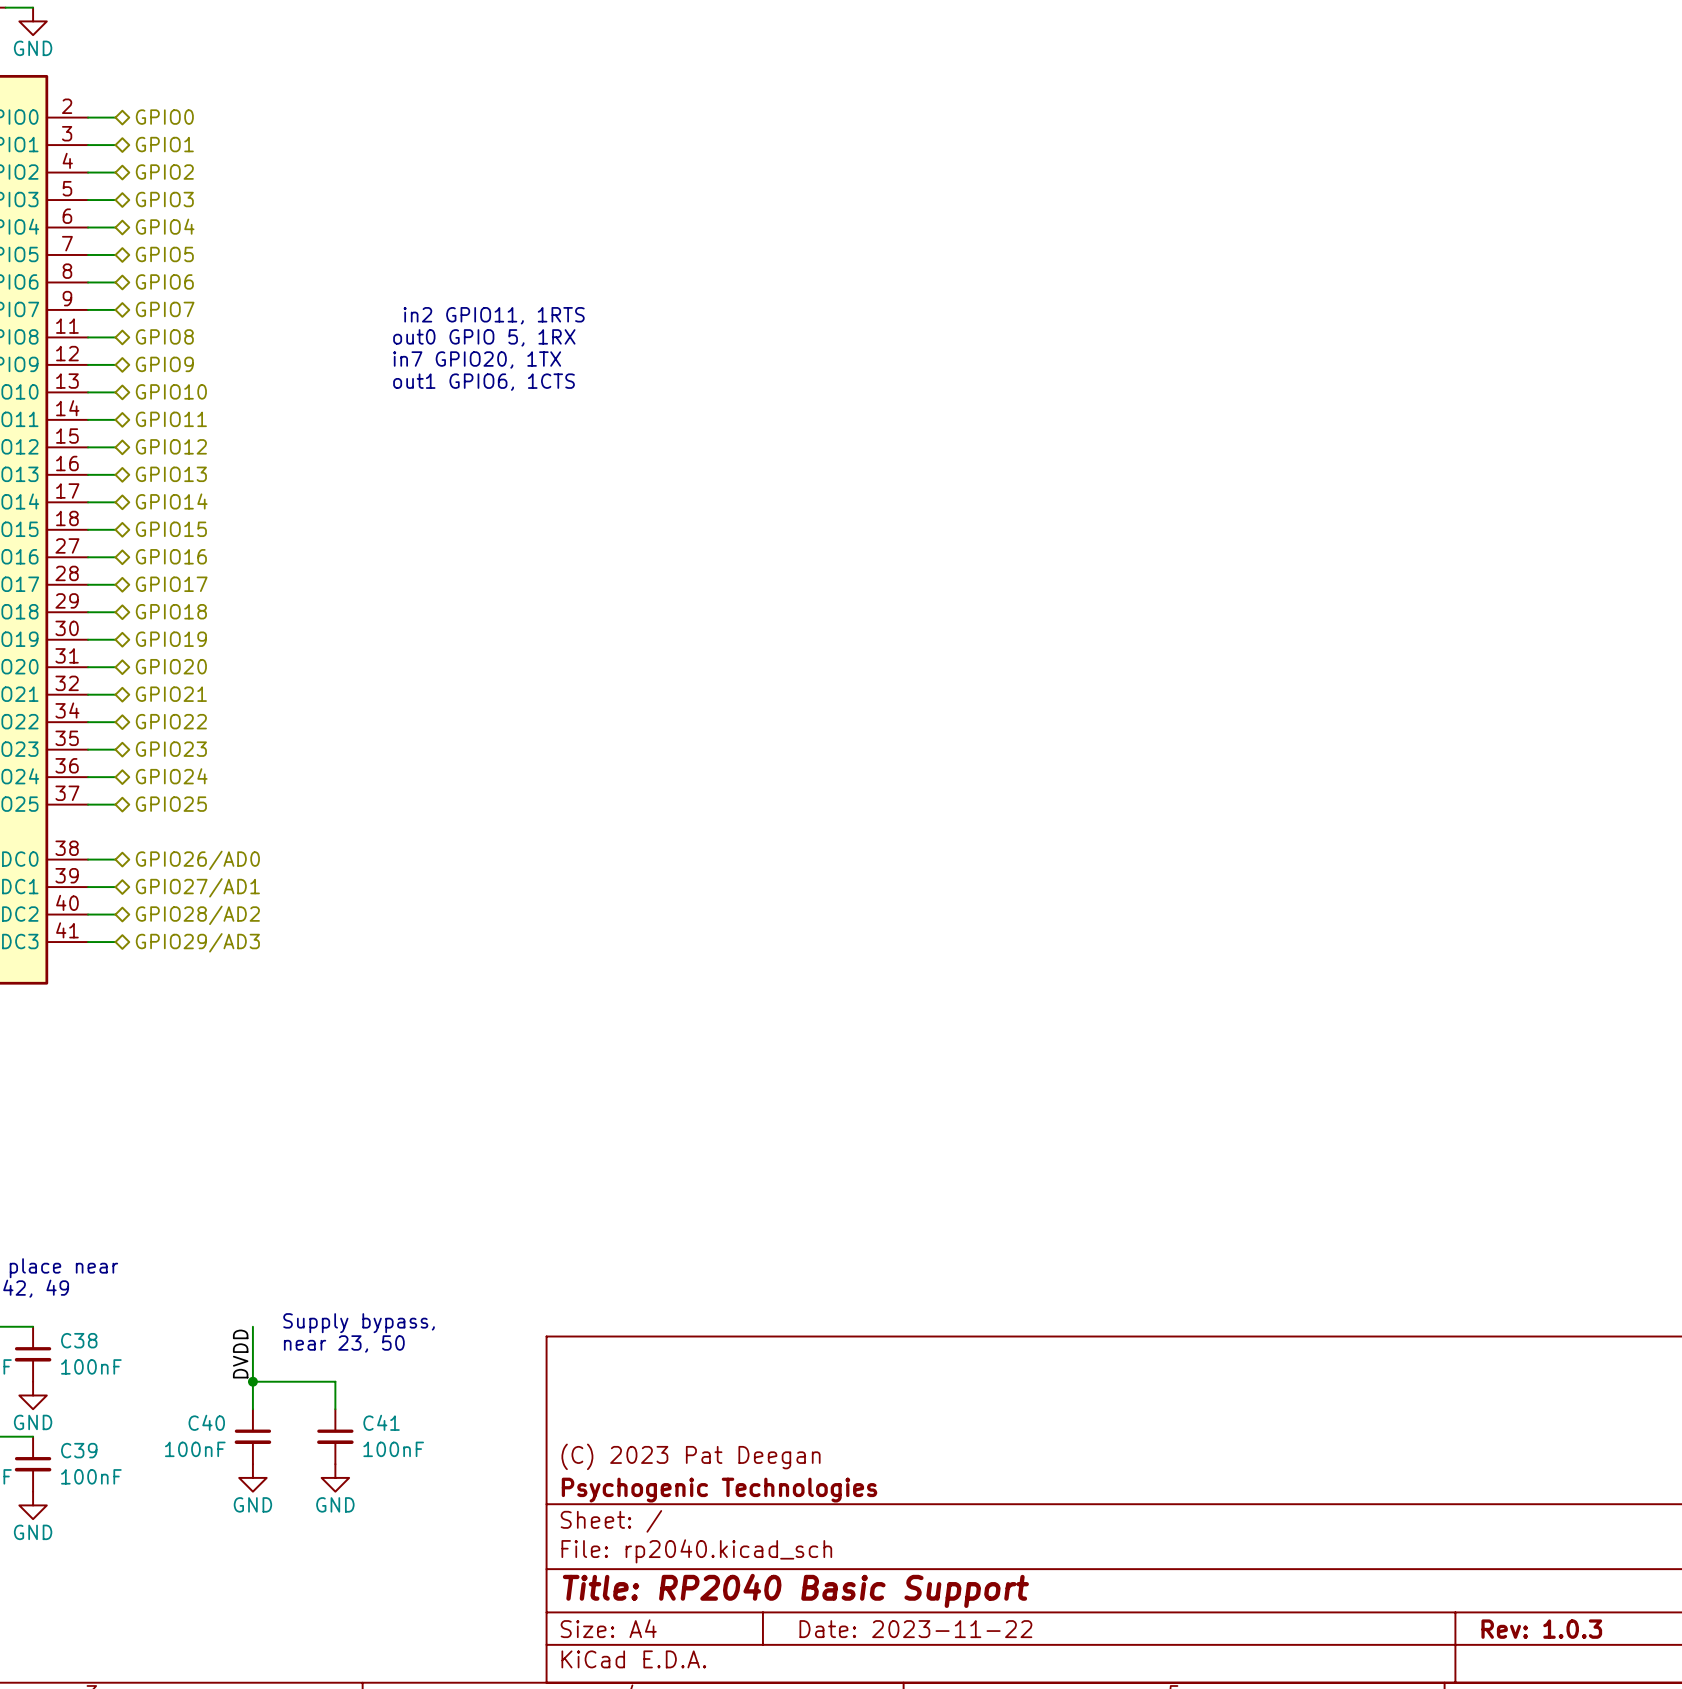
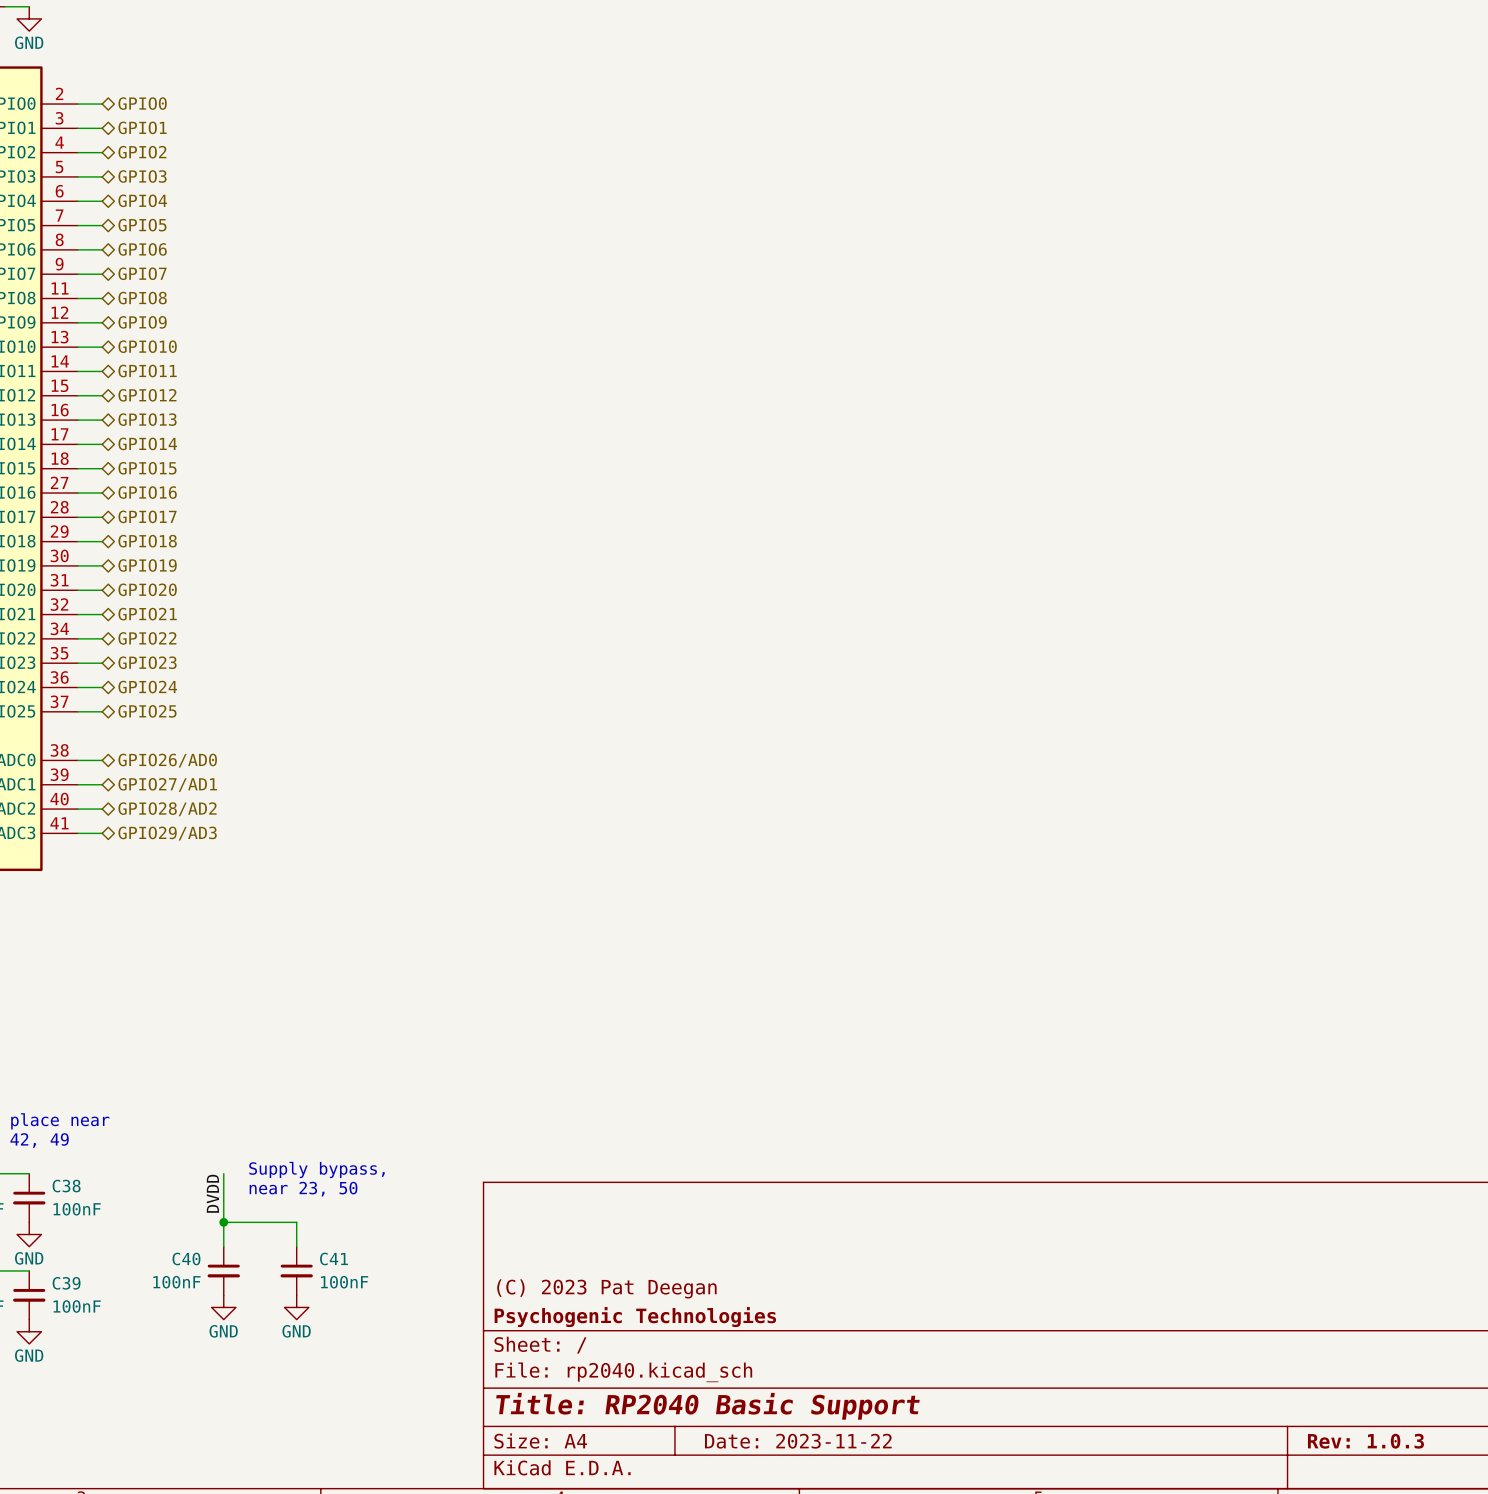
text: in2 GPIO11, 1RTS (494, 315) -> none
text: out0 GPIO 5, 1RX (484, 337) -> none
text: in7 GPIO20, 1TX (477, 360) -> none
text: out1 GPIO6, 1CTS (484, 382) -> none

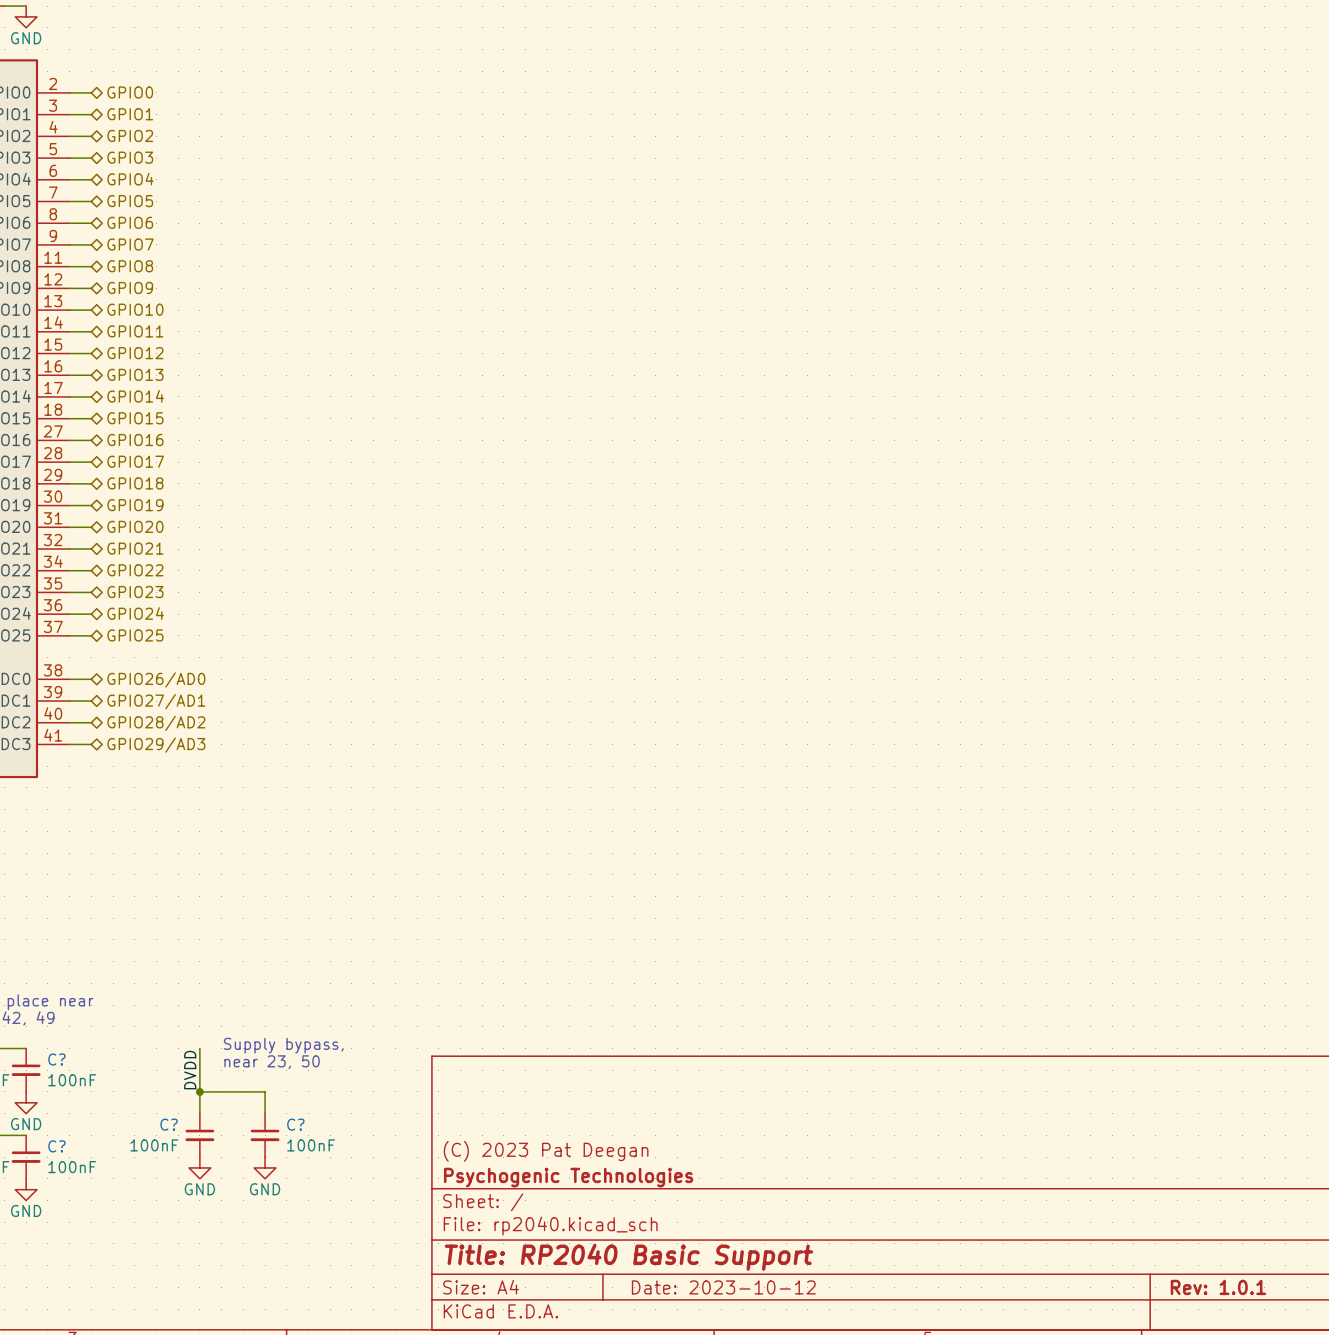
C38 name: C38 (66, 1186) -> C? (56, 1059)
C40 name: C40 (186, 1258) -> C? (169, 1124)
C41 name: C41 (333, 1258) -> C? (295, 1124)
C39 name: C39 (66, 1283) -> C? (56, 1146)
title block: Date: 2023-11-22 (798, 1441) -> Date: 2023-10-12 (723, 1287)
title block: Rev: 1.0.3 (1365, 1441) -> Rev: 1.0.1 (1218, 1287)

